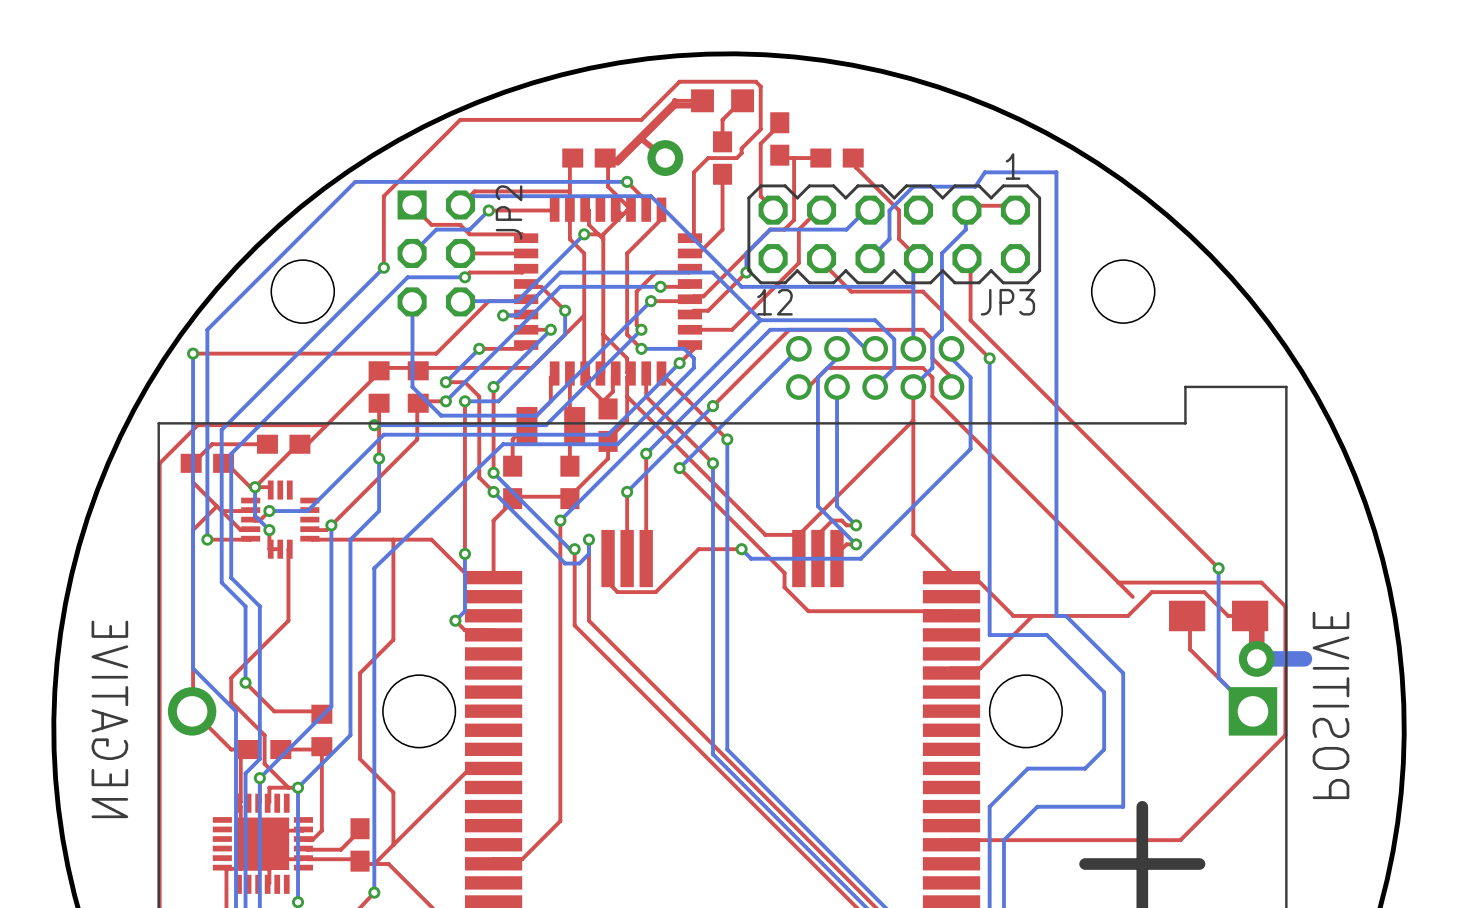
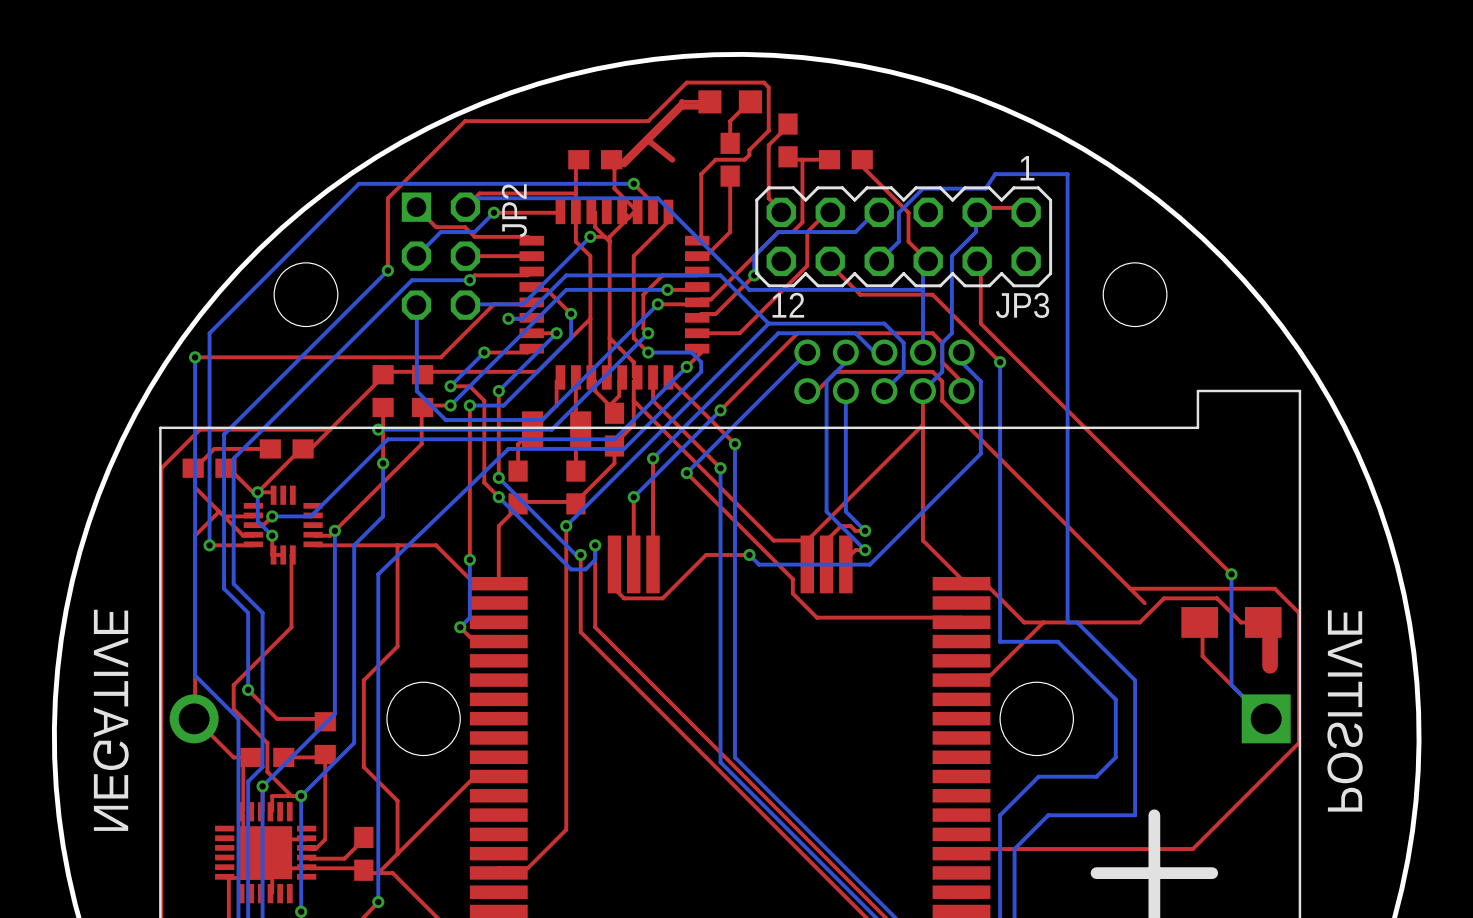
part: (665, 158) -> none
part: (1256, 658) -> none
bottom track: (1304, 658) (1256, 658) -> none

